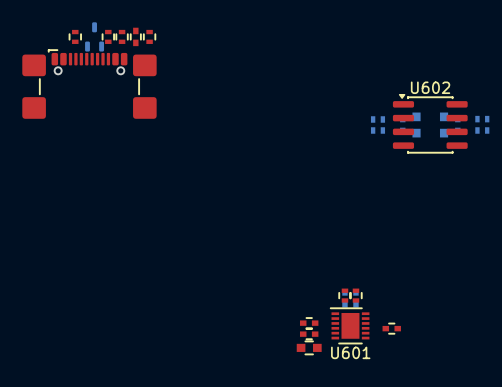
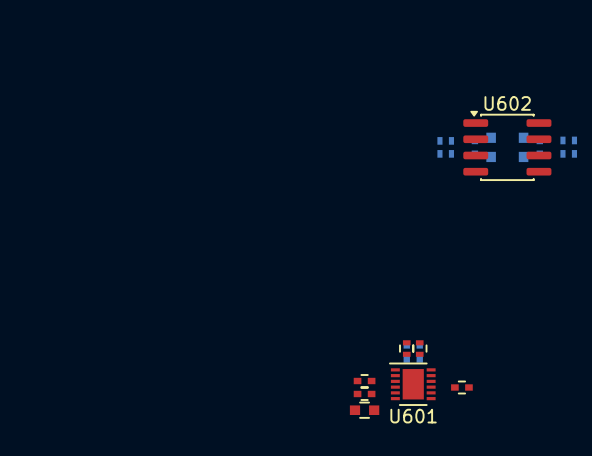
part: (75, 36) -> none
part: (94, 36) -> none
part: (108, 36) -> none
part: (122, 36) -> none
part: (135, 36) -> none
part: (149, 36) -> none
part: (89, 84) -> none

